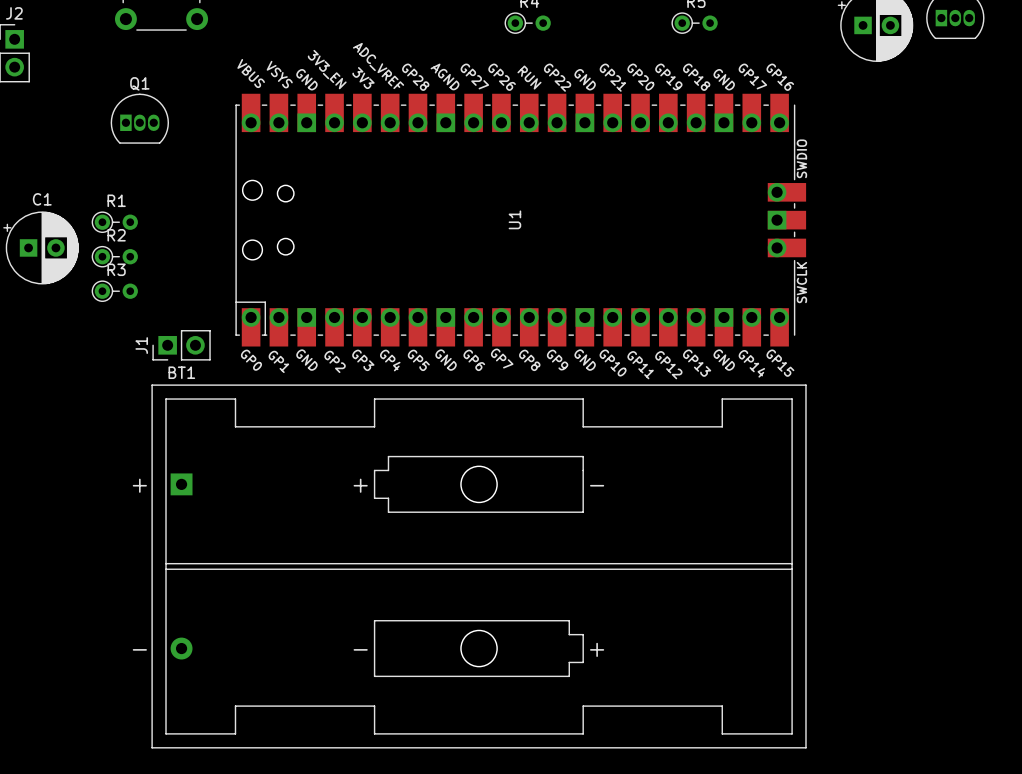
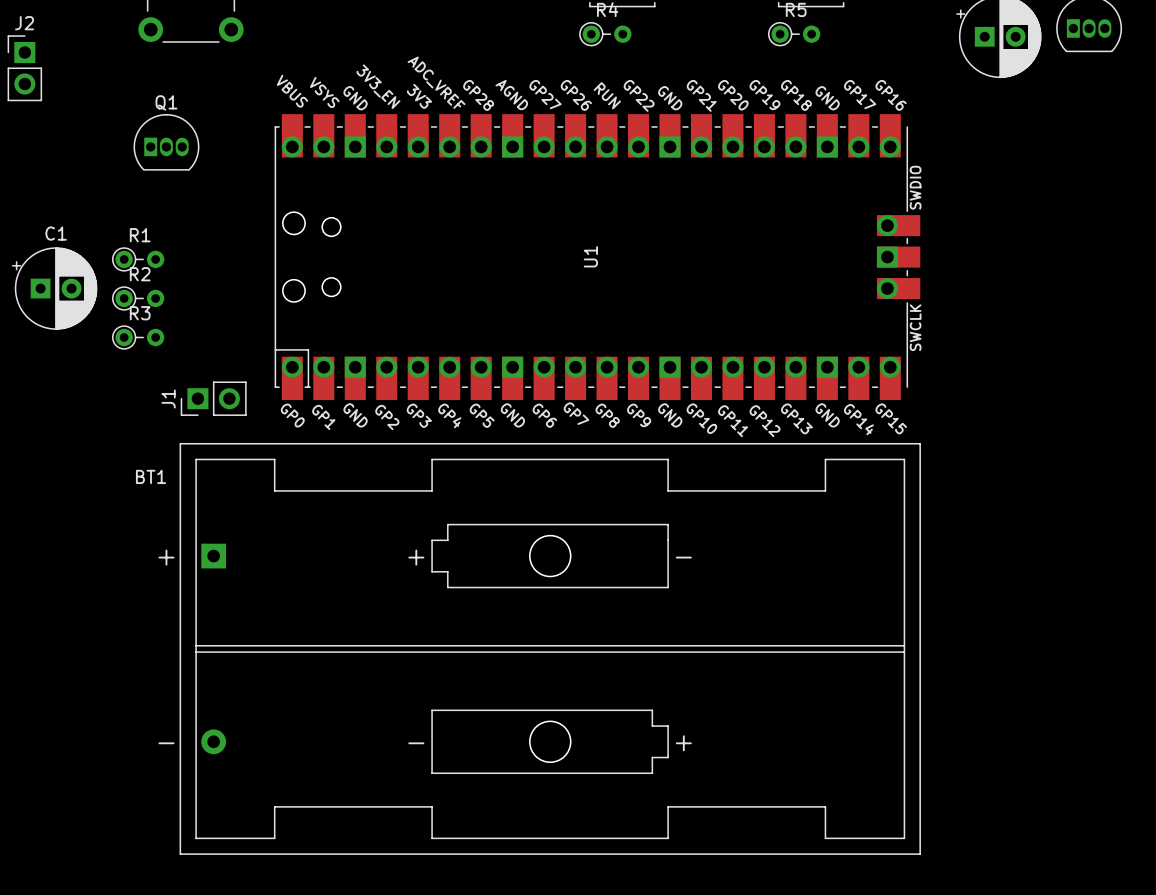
BT1 name position: BT1 (181, 372) -> BT1 (151, 476)

